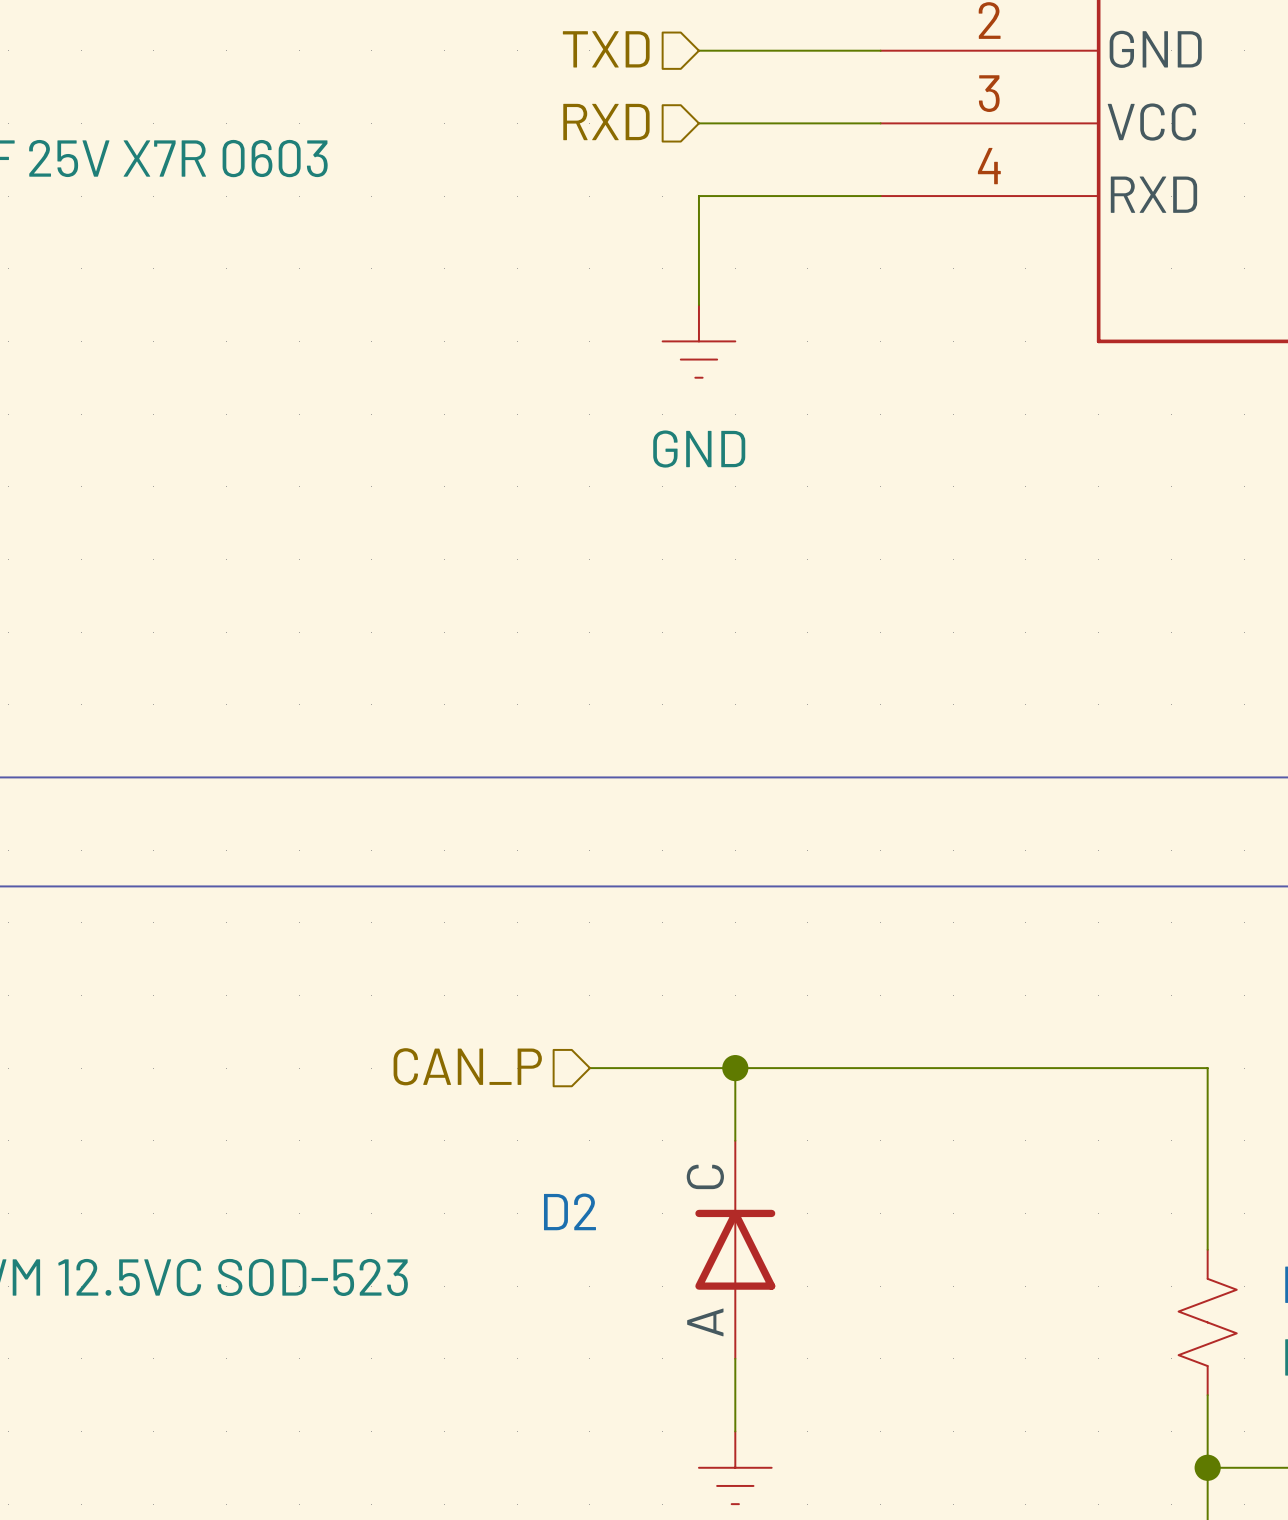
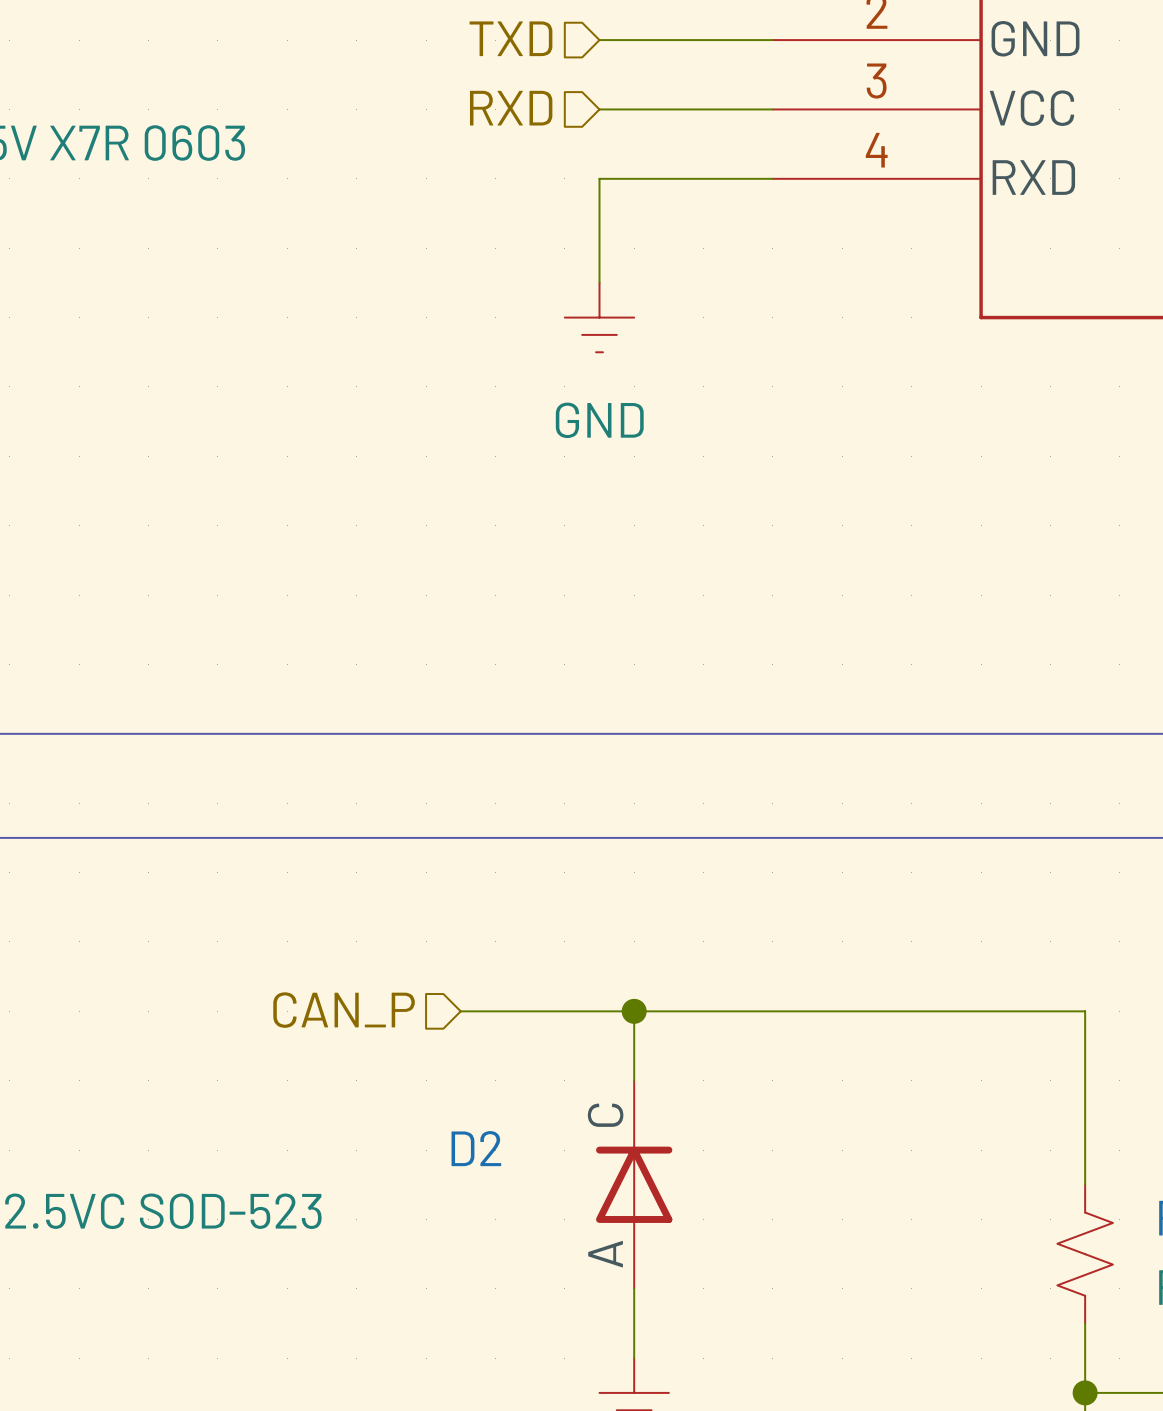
hierarchical label position: CAN_P (467, 1066) -> CAN_P (344, 1010)
wire: none -> (460, 1011) (495, 1011)

